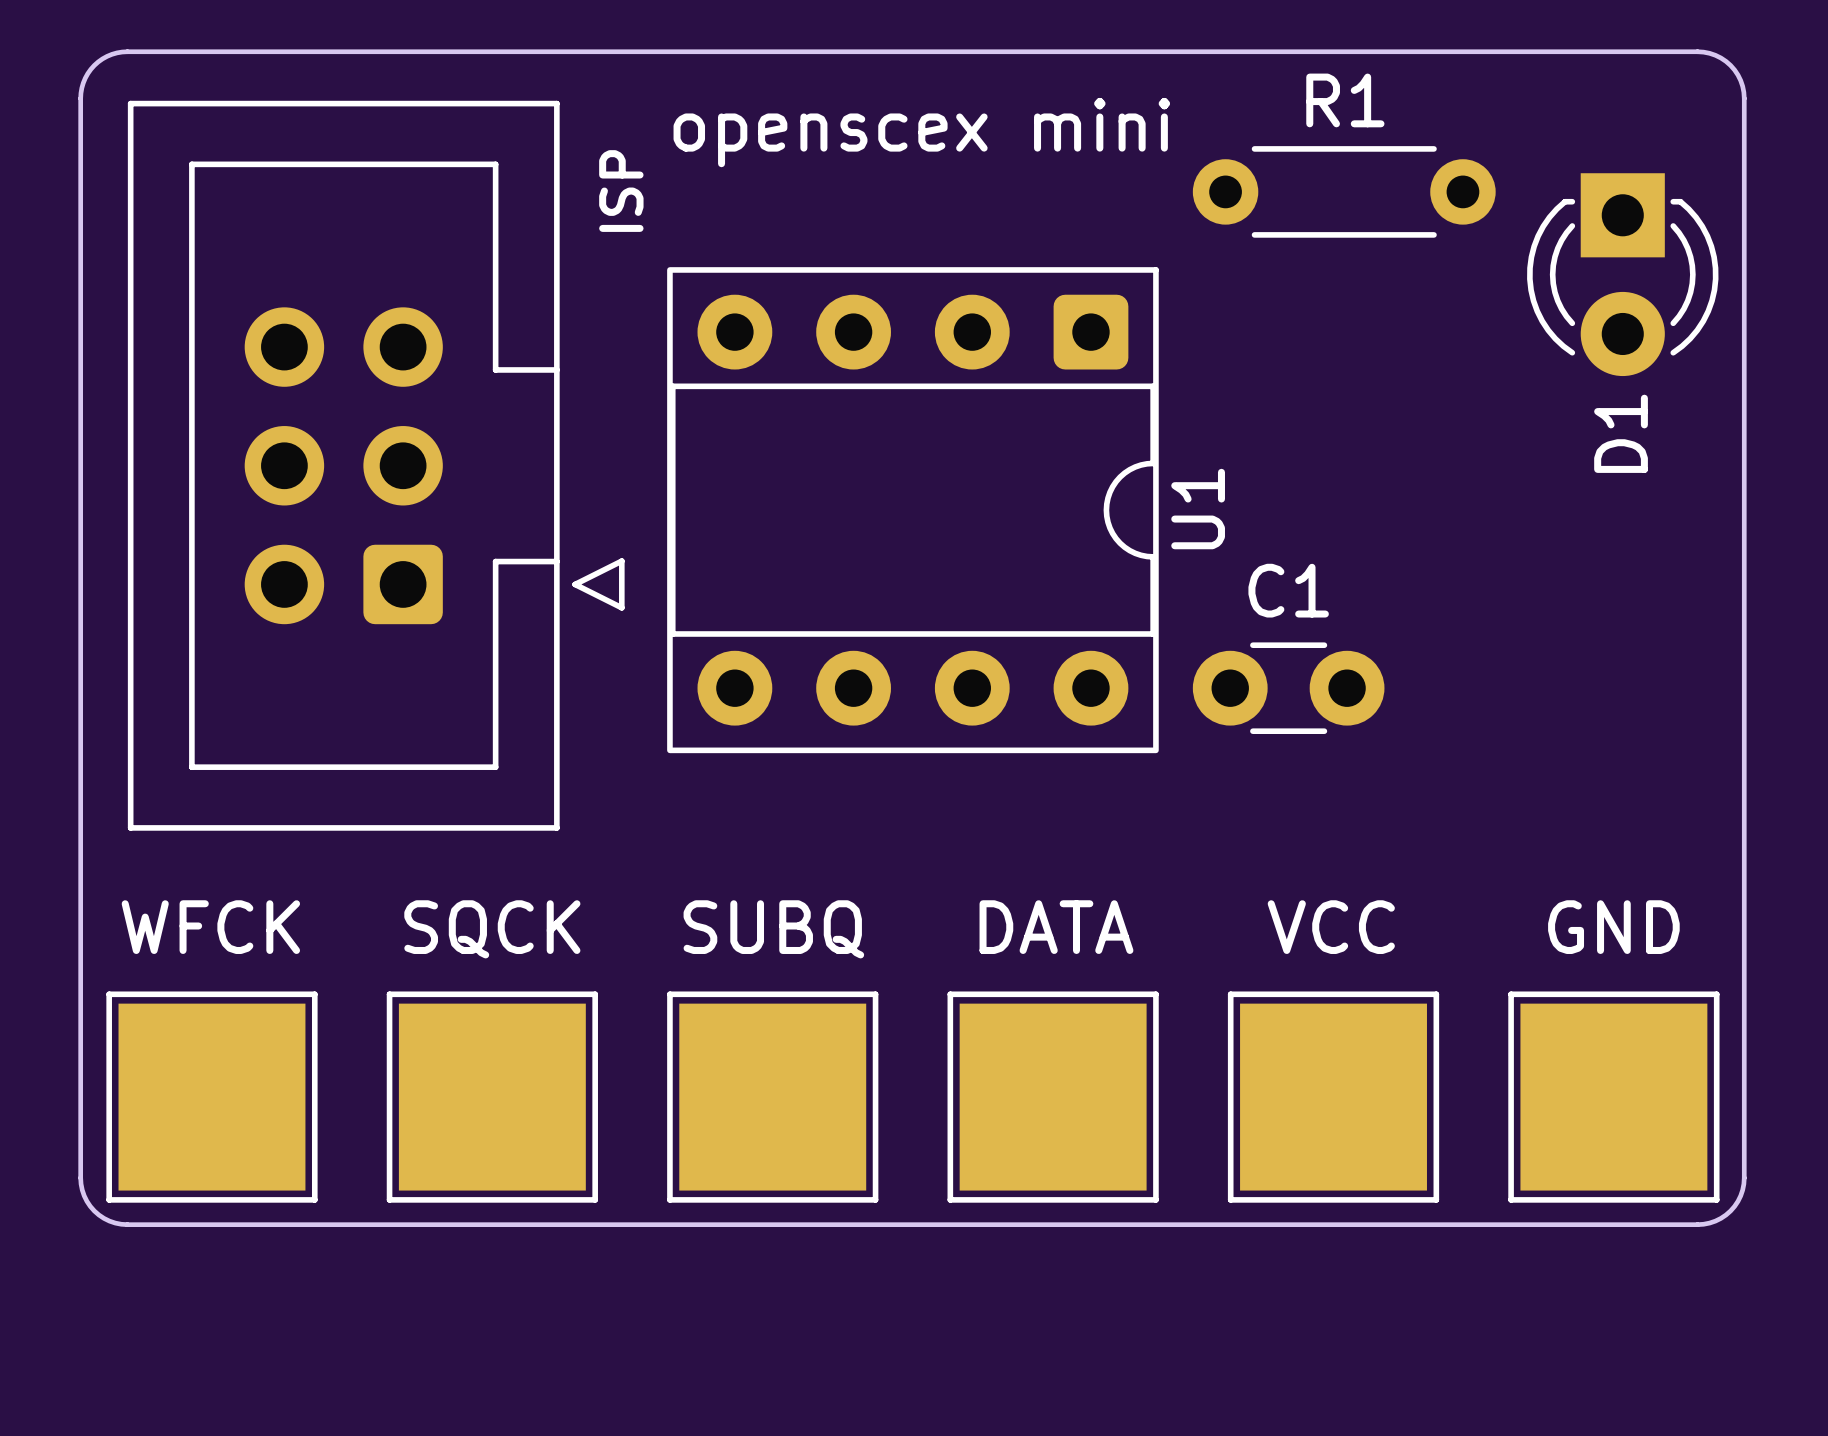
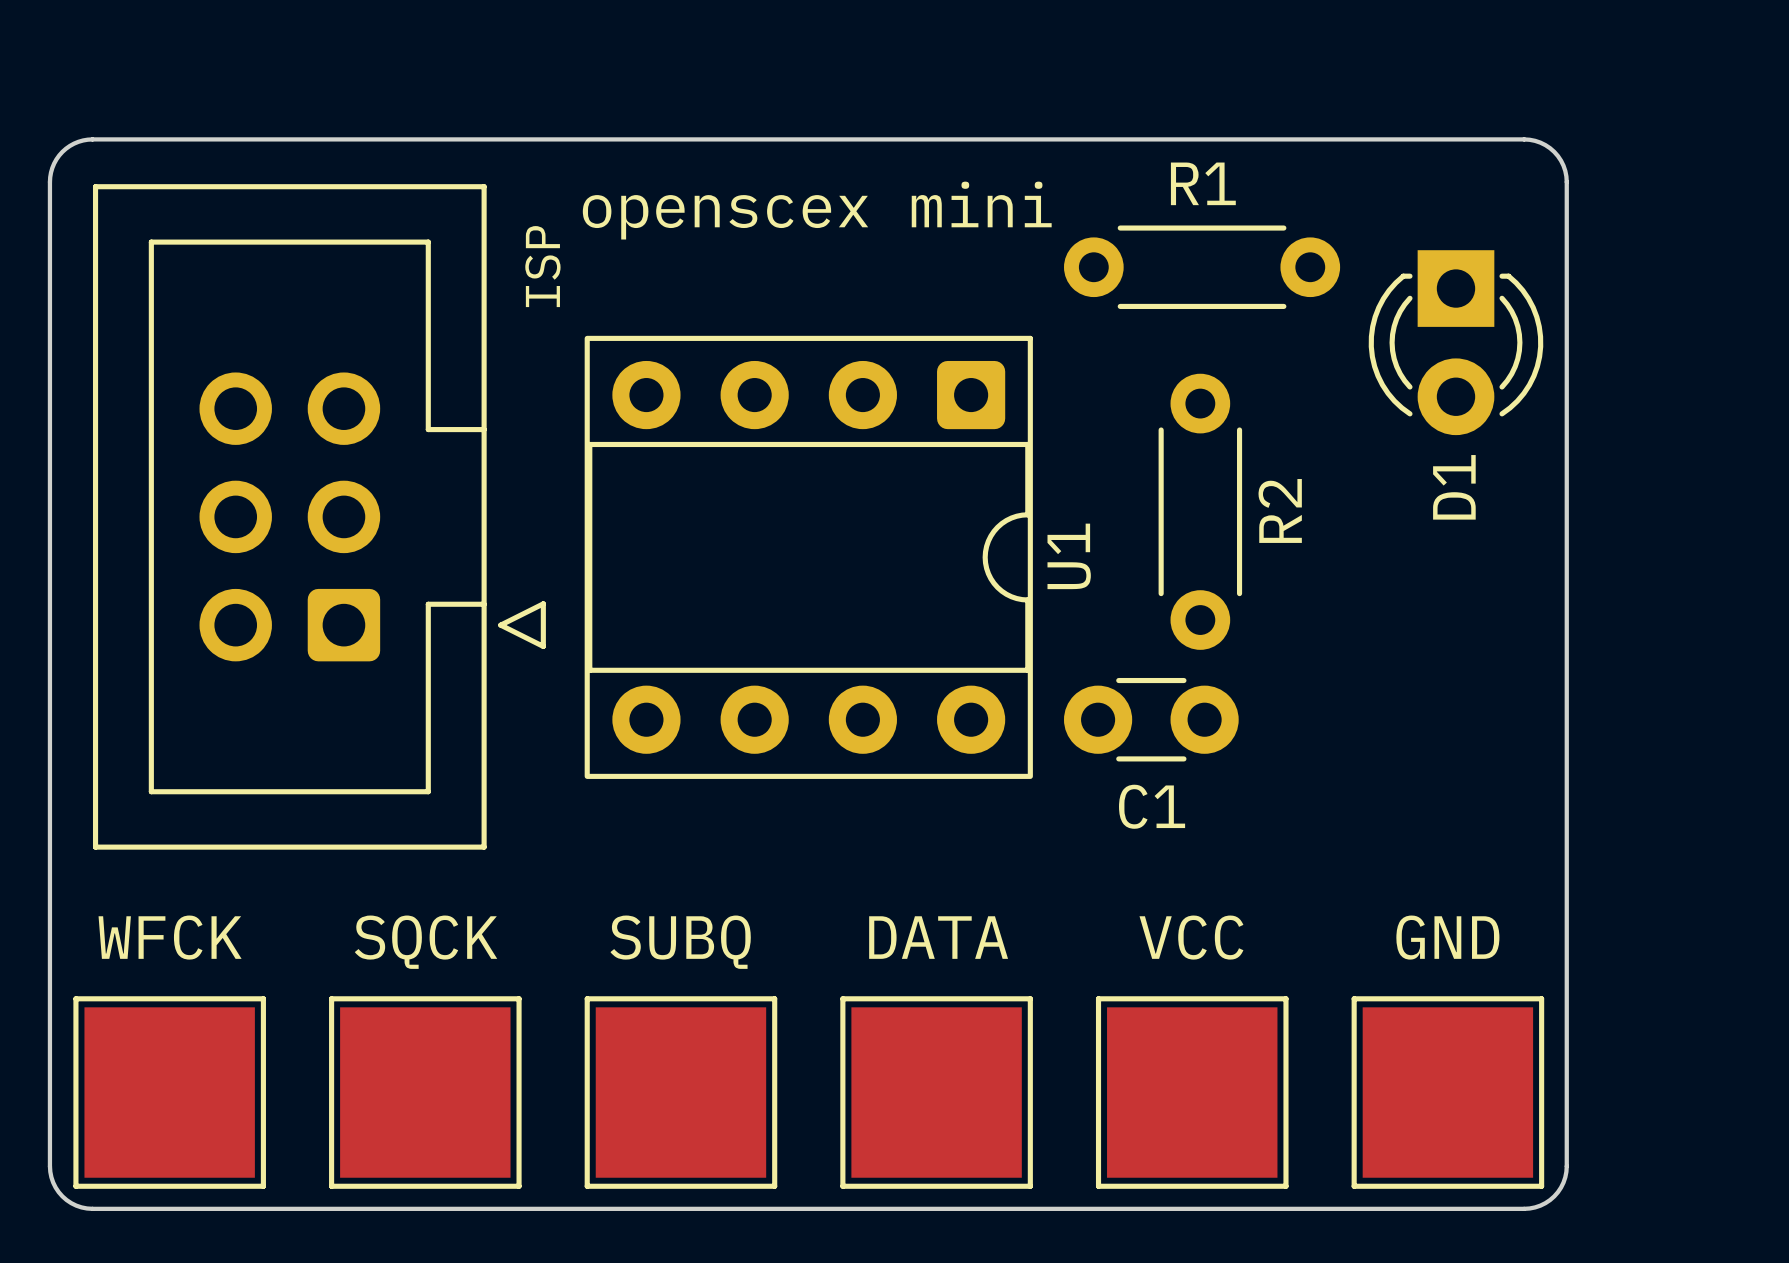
R2: none -> (1200, 511)
C1 name position: C1 (1288, 590) -> C1 (1152, 806)

